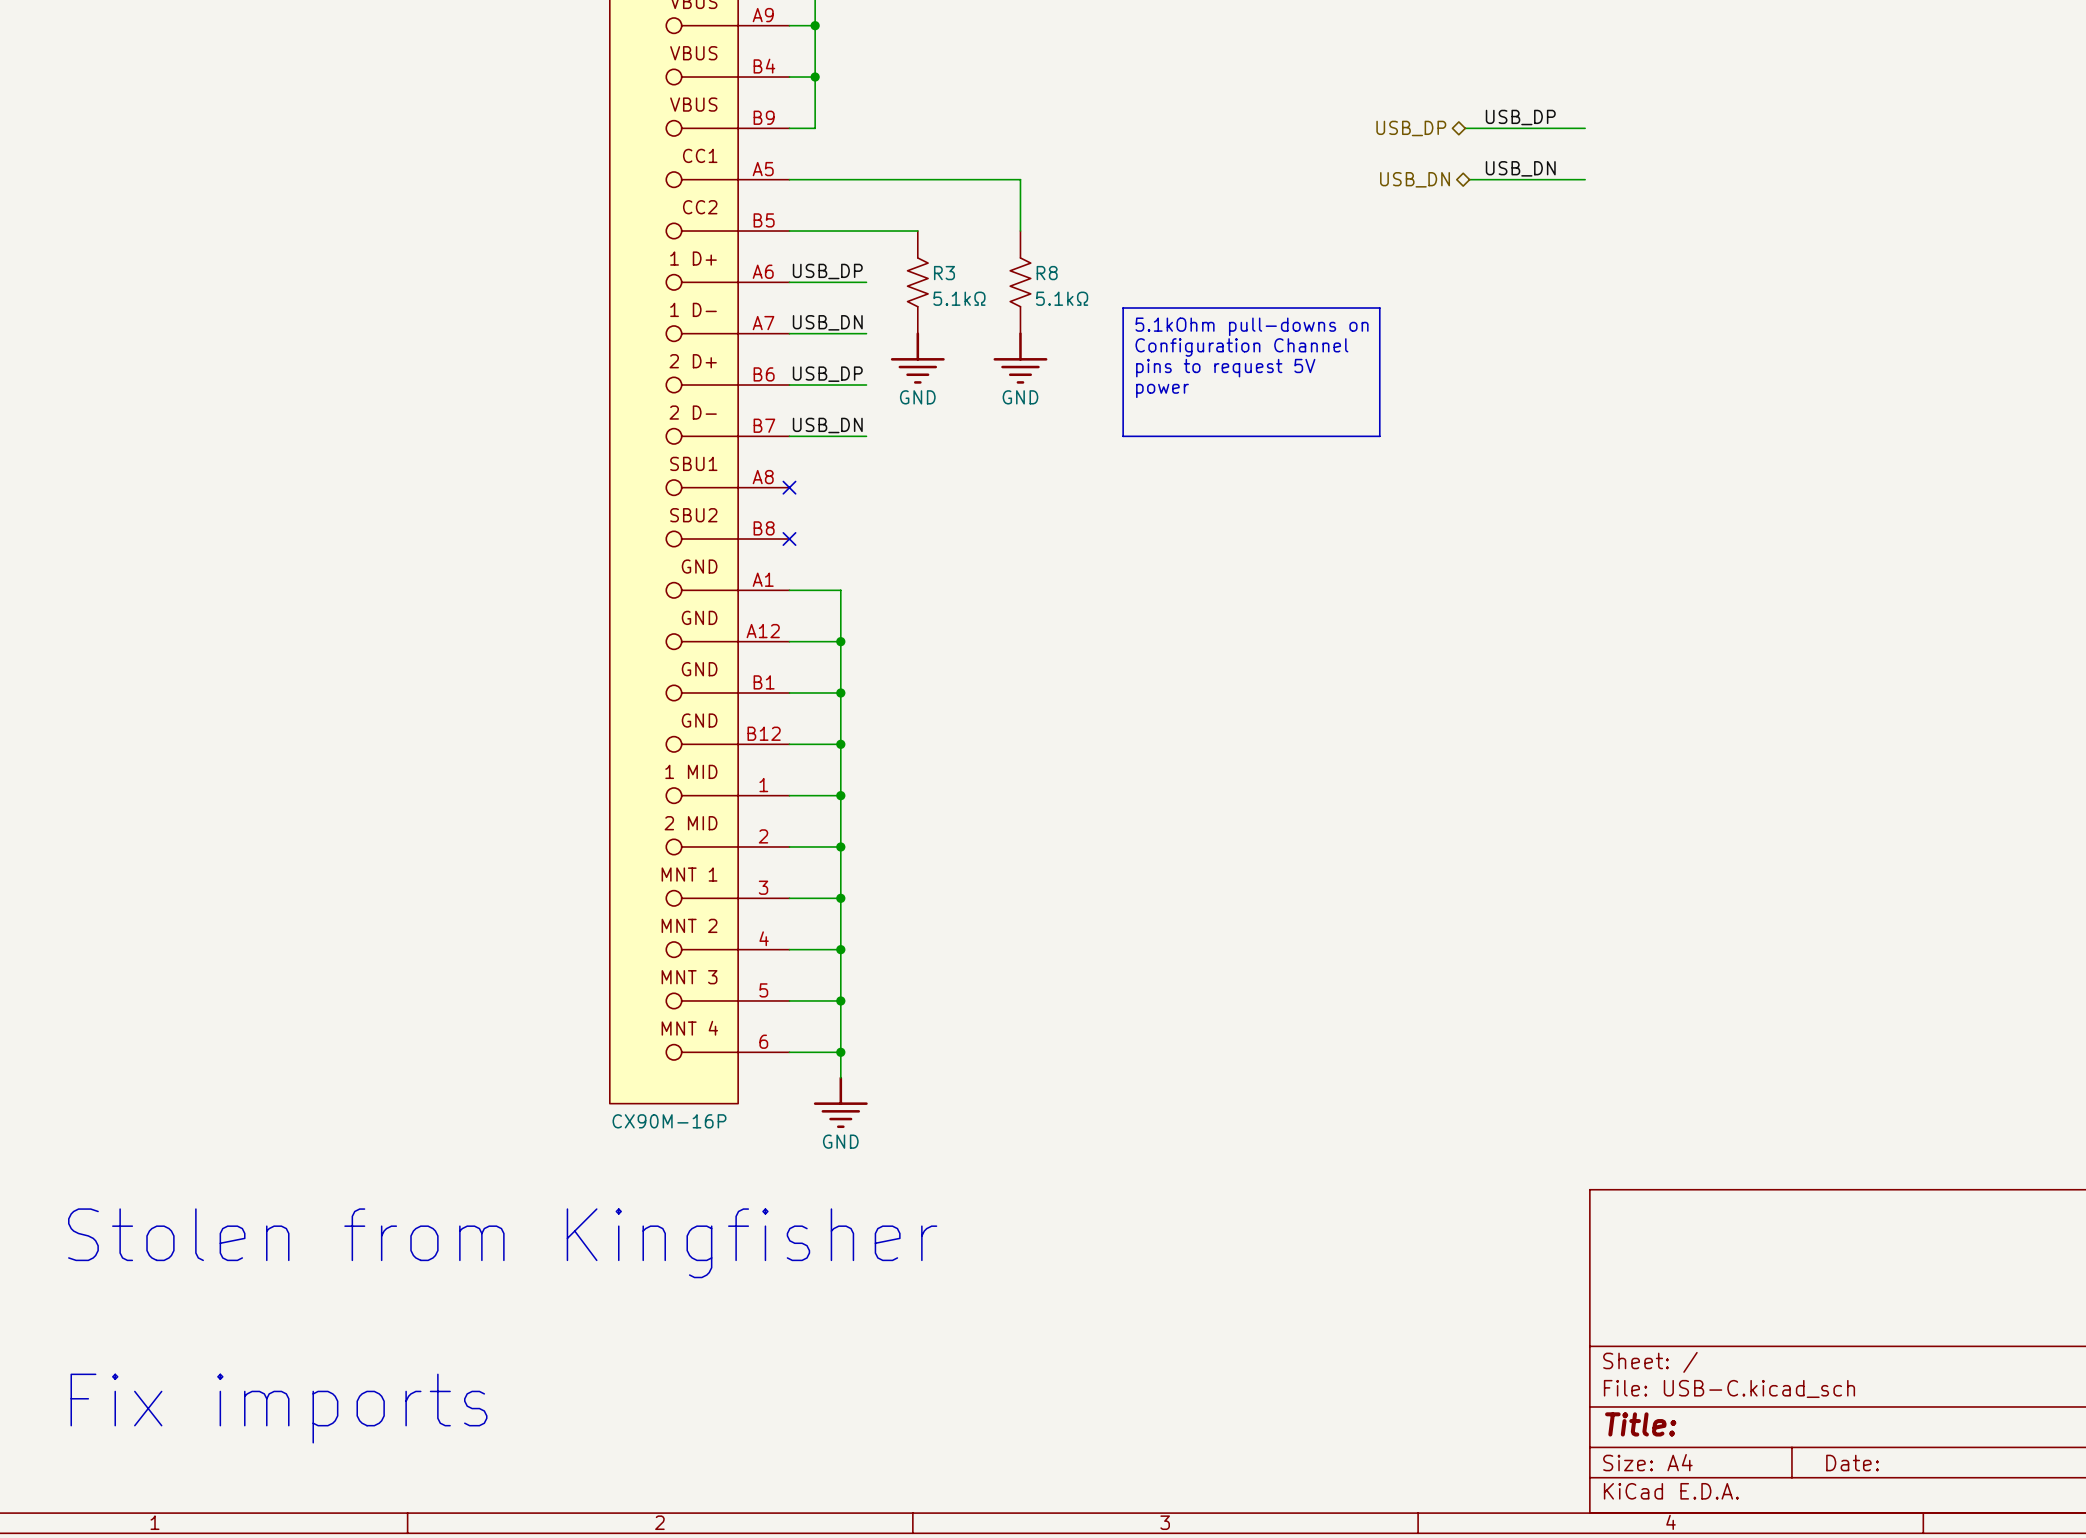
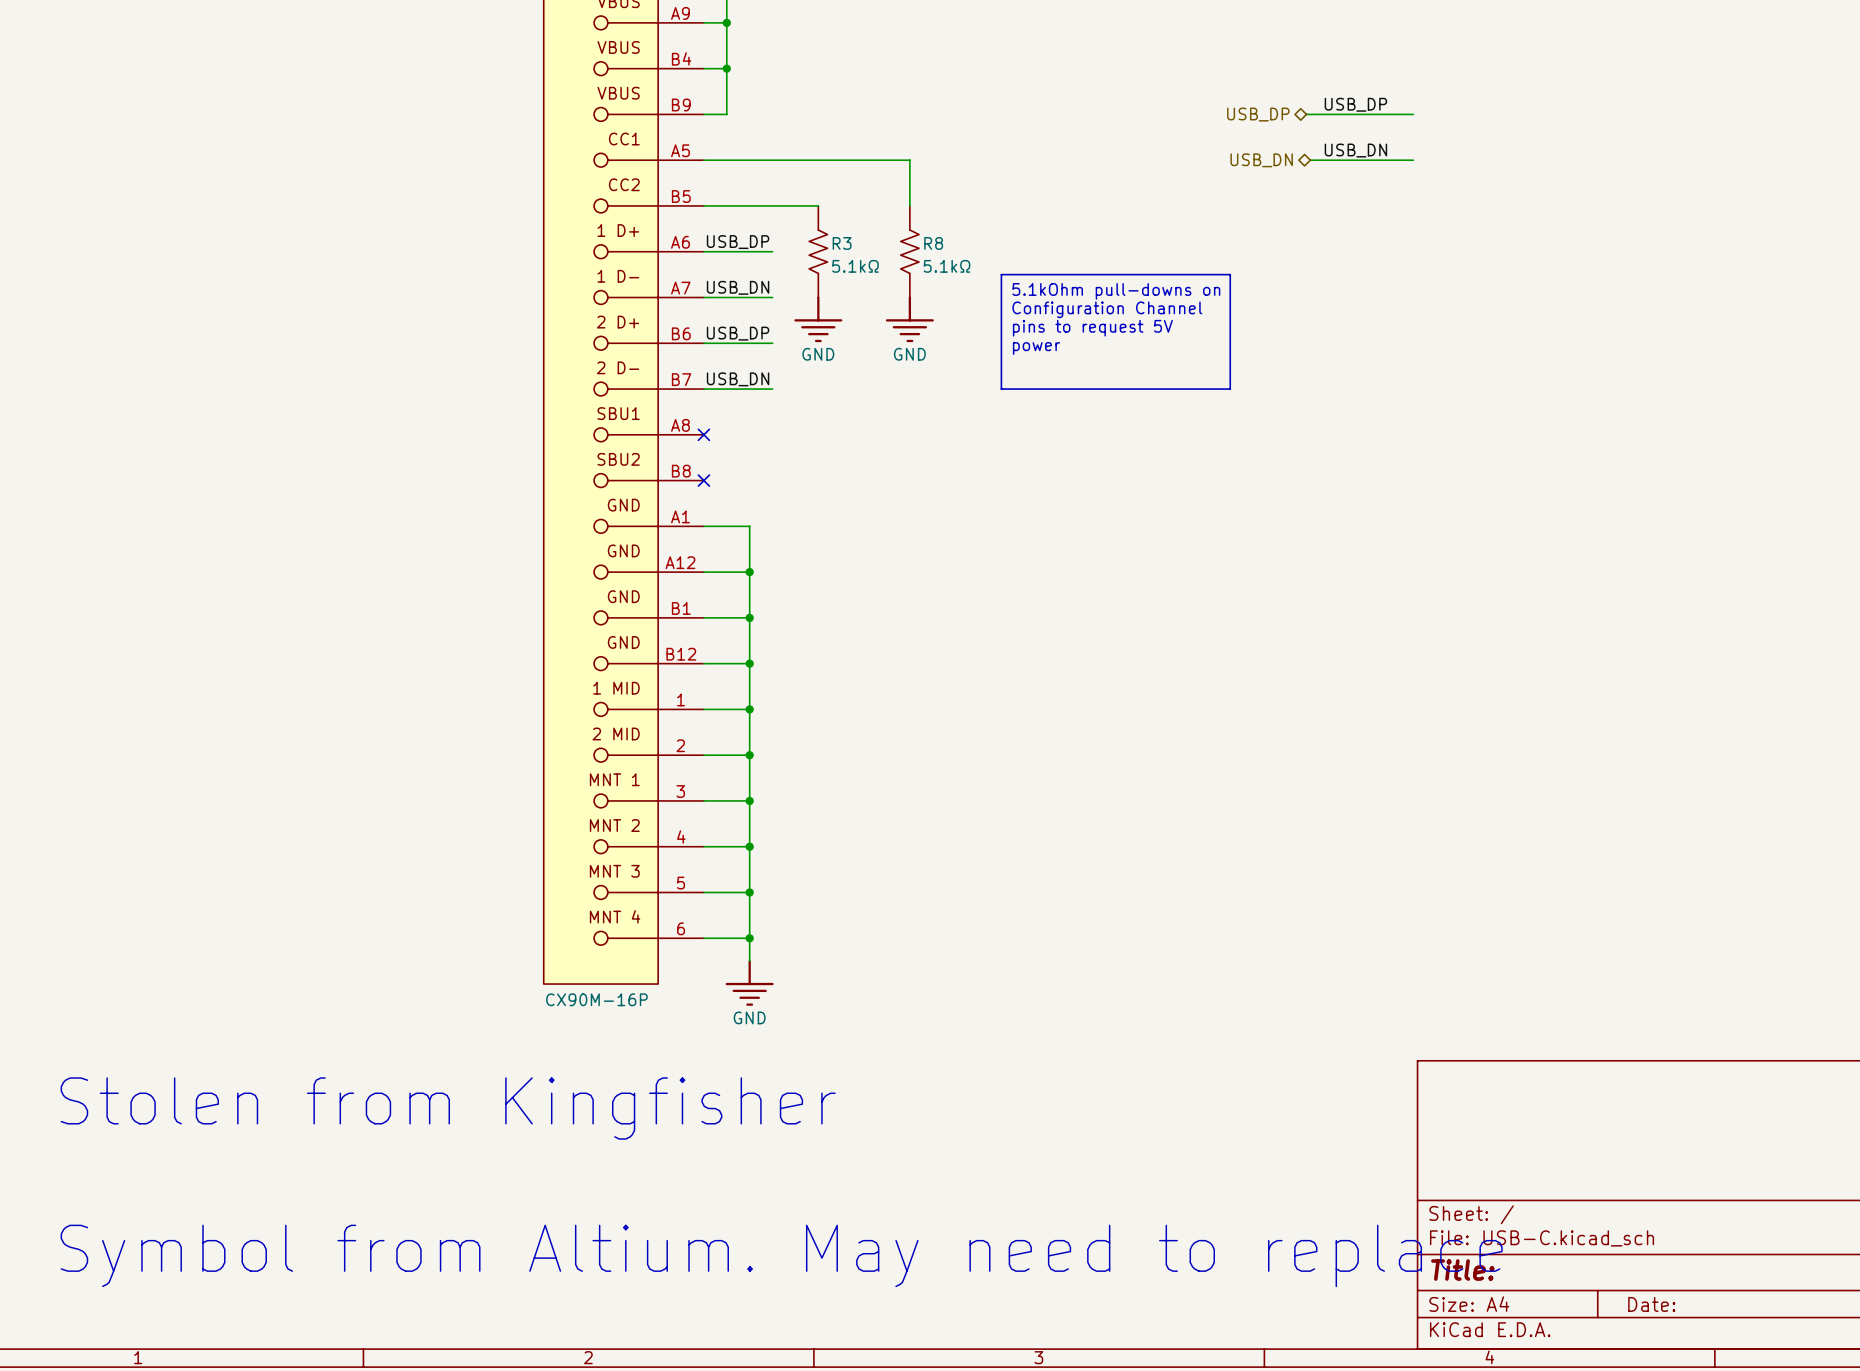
text: Fix imports (279, 1408) -> Symbol from Altium. May need to replace (781, 1255)

